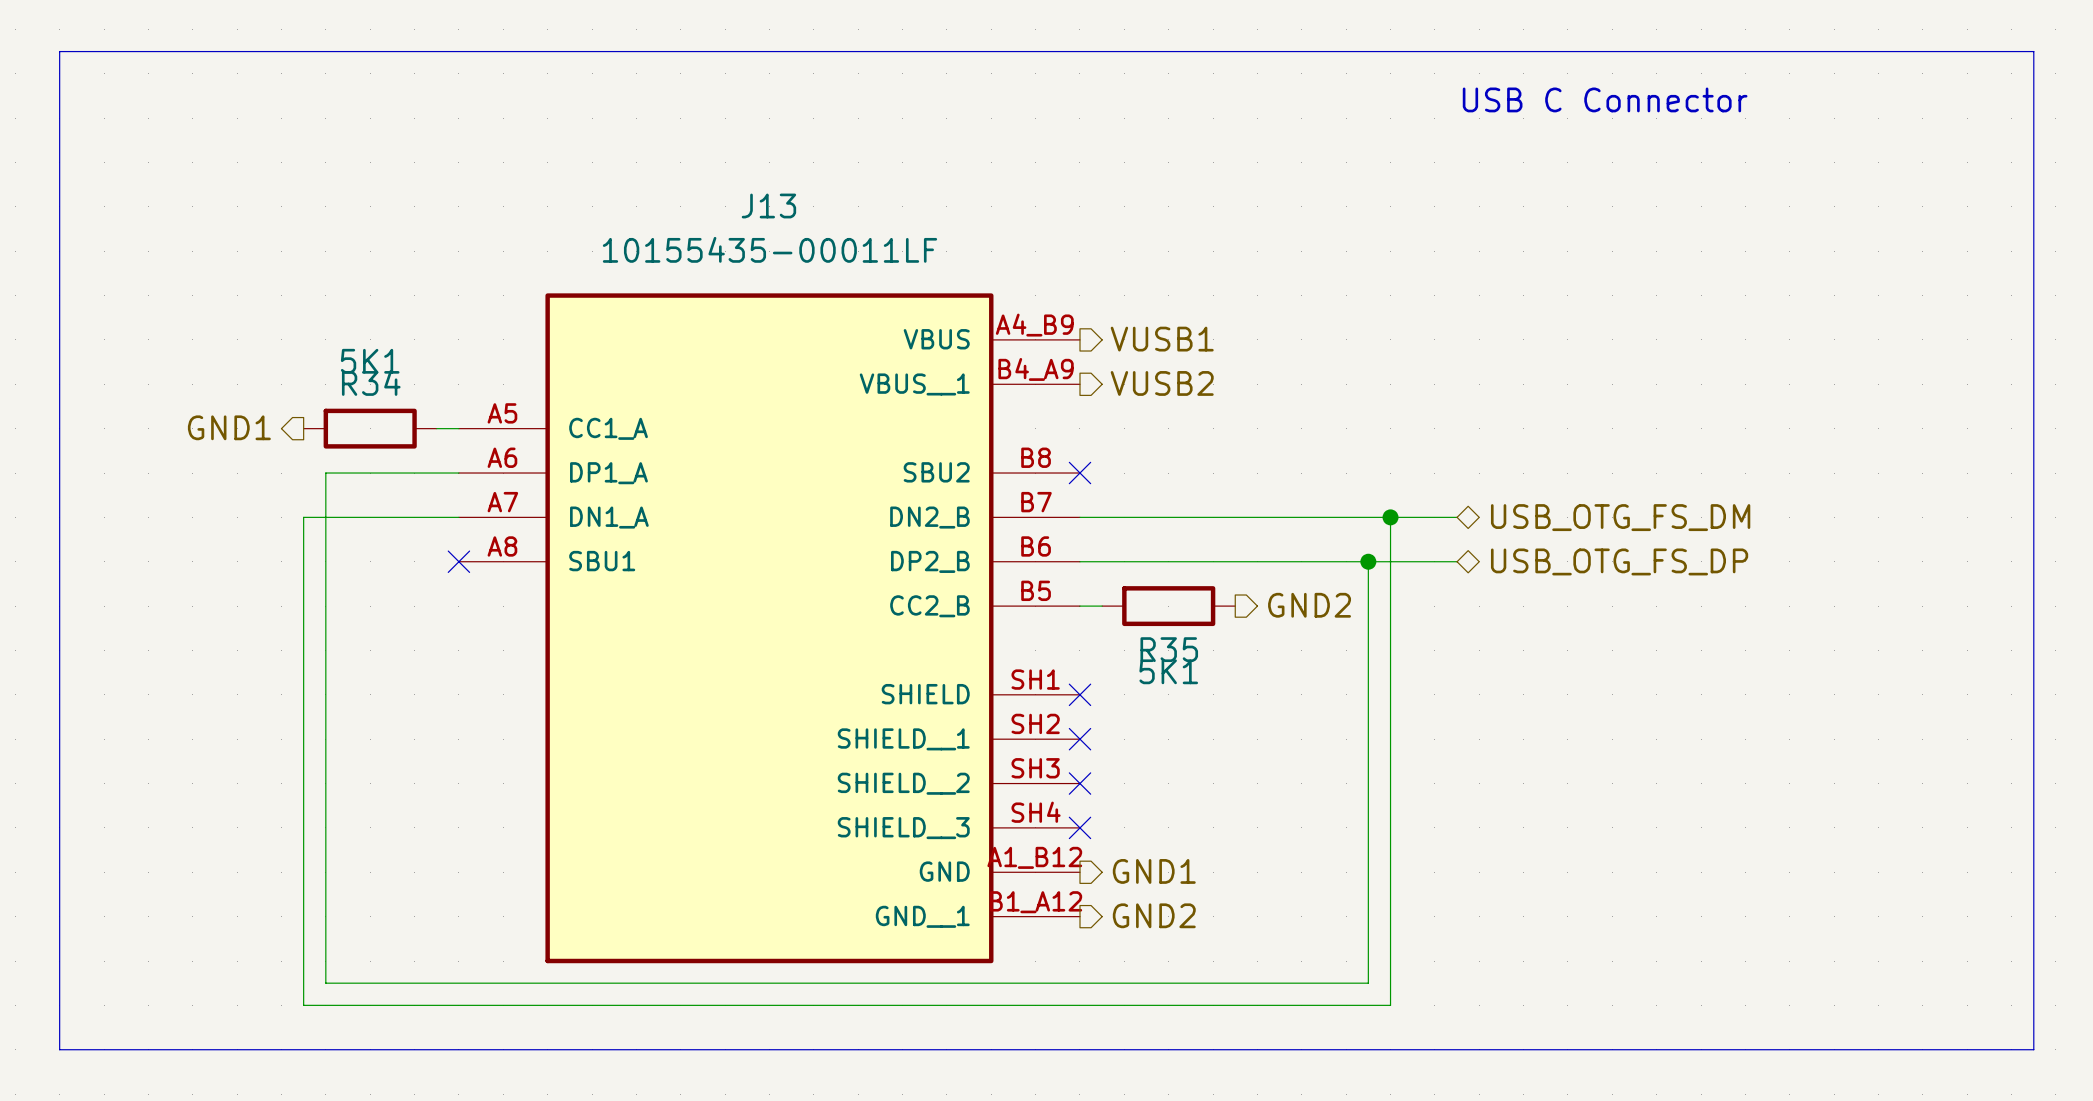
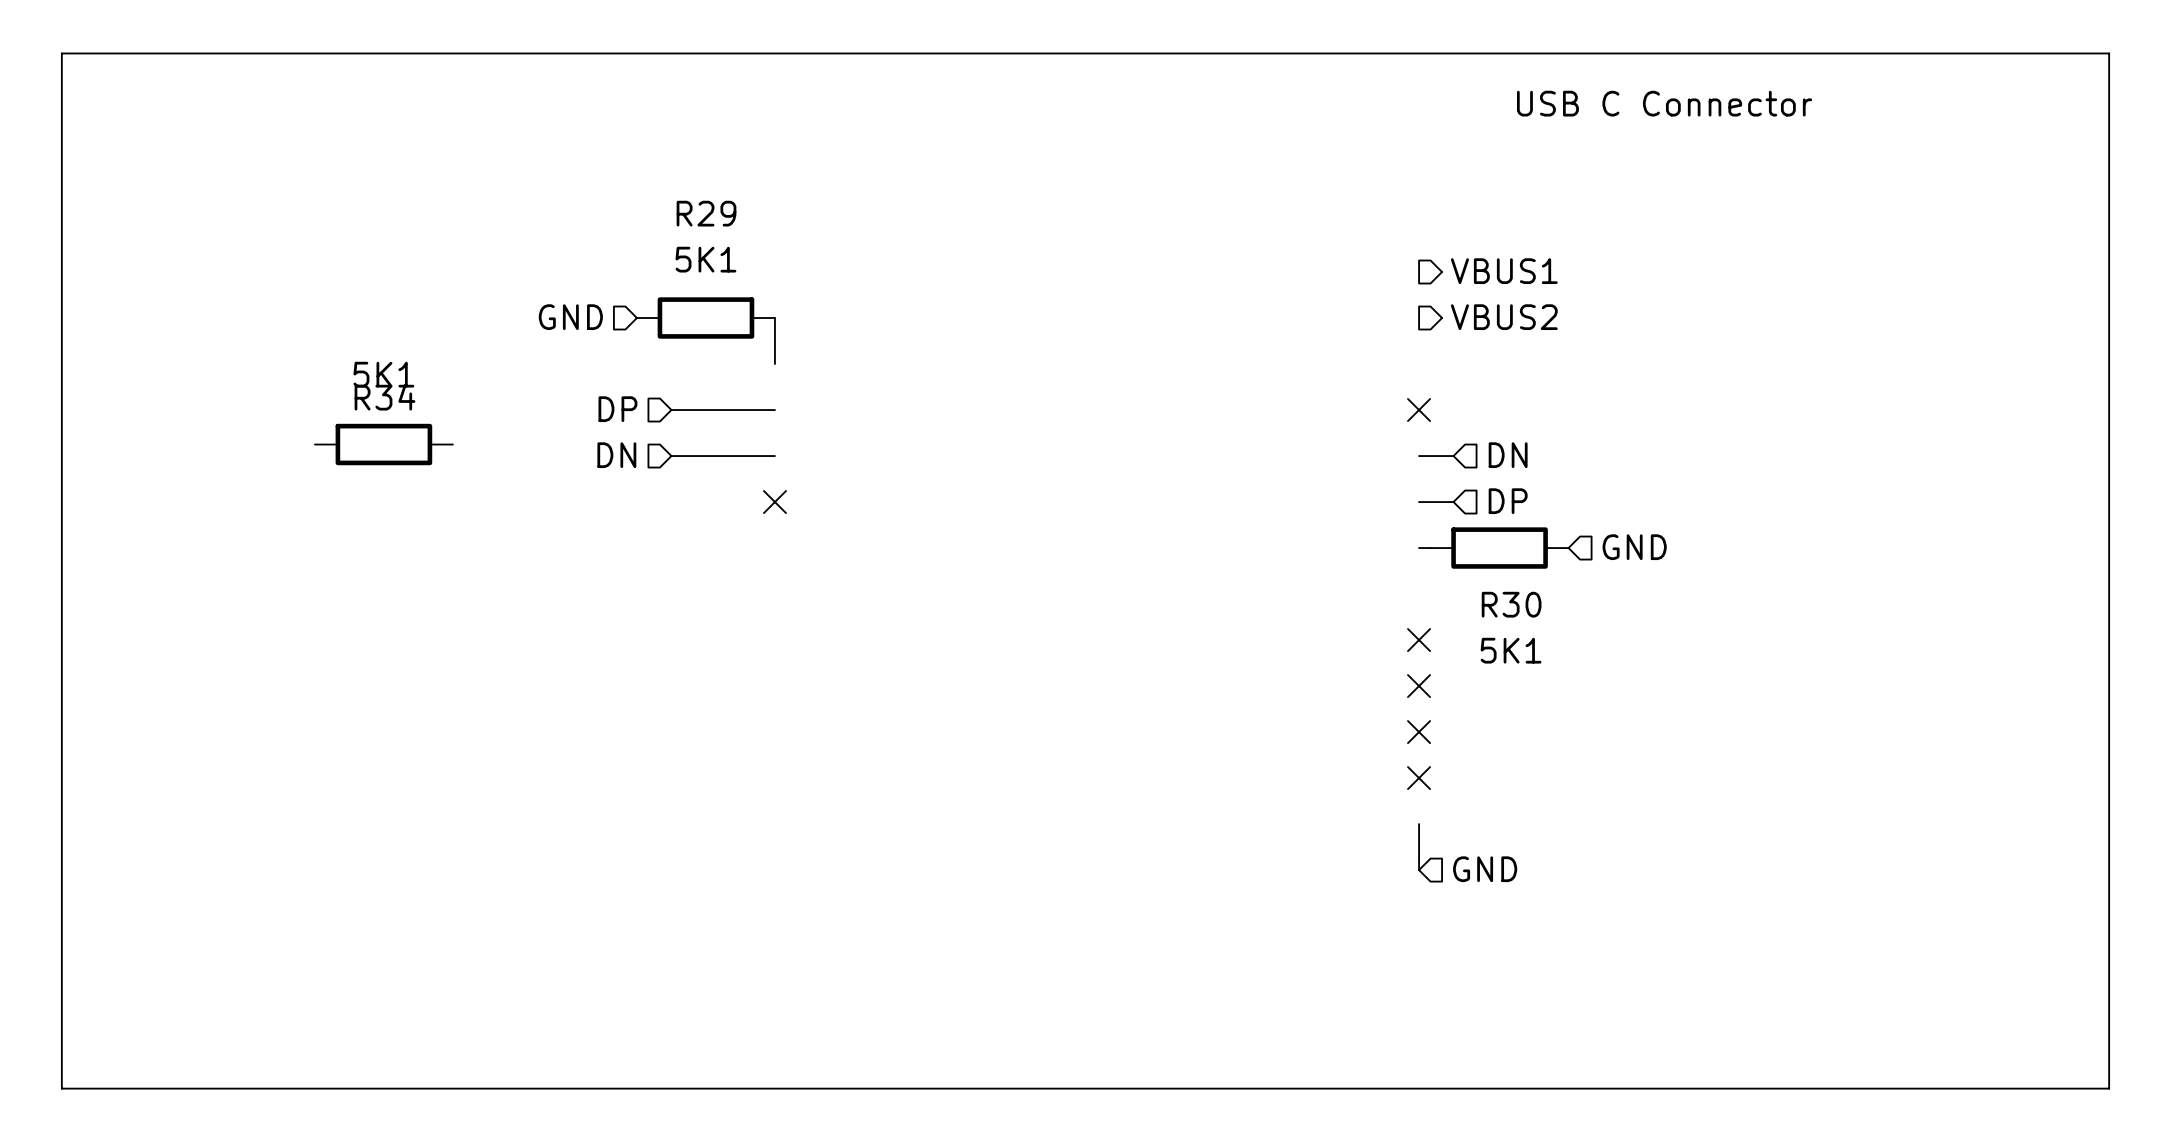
hierarchical label: none -> VBUS1 (1504, 271)
hierarchical label: none -> GND (570, 317)
hierarchical label: none -> VBUS2 (1504, 317)
R29: none -> 5K1 (705, 318)
hierarchical label: VUSB1 (1162, 339) -> none
hierarchical label: VUSB2 (1162, 383) -> none
hierarchical label: none -> DP (617, 409)
no-connect mark: none -> (1419, 410)
hierarchical label: GND1 (229, 427) -> none
wire: (436, 428) (458, 428) -> none
hierarchical label: none -> DN (616, 455)
hierarchical label: none -> DN (1508, 455)
wire: none -> (1419, 456) (1453, 456)
wire: (458, 473) (325, 473) (325, 983) (1368, 983) (1368, 839) -> none
no-connect mark: (1079, 473) -> none
hierarchical label: none -> DP (1508, 501)
no-connect mark: none -> (774, 502)
wire: none -> (1419, 502) (1453, 502)
wire: (458, 517) (303, 517) (303, 1005) (1390, 1005) (1390, 517) -> none
wire: (1079, 517) (1457, 517) -> none
junction: (1390, 517) -> none
hierarchical label: USB_OTG_FS_DM (1620, 517) -> none
hierarchical label: none -> GND (1634, 547)
wire: none -> (1419, 548) (1430, 548)
R30: none -> 5K1 (1499, 548)
no-connect mark: (458, 561) -> none
wire: (1079, 561) (1457, 561) -> none
wire: (1368, 561) (1368, 794) -> none
junction: (1368, 561) -> none
hierarchical label: USB_OTG_FS_DP (1619, 561) -> none
hierarchical label: GND2 (1309, 605) -> none
wire: (1079, 606) (1102, 606) -> none
R35: 5K1 (1168, 606) -> none
no-connect mark: none -> (1419, 640)
J13: 10155435-00011LF (769, 628) -> none
no-connect mark: none -> (1419, 686)
no-connect mark: (1079, 694) -> none
no-connect mark: none -> (1419, 732)
no-connect mark: (1079, 739) -> none
no-connect mark: none -> (1419, 778)
no-connect mark: (1079, 783) -> none
no-connect mark: (1079, 827) -> none
hierarchical label: none -> GND (1485, 869)
hierarchical label: GND1 (1154, 871) -> none
hierarchical label: GND2 (1154, 915) -> none

